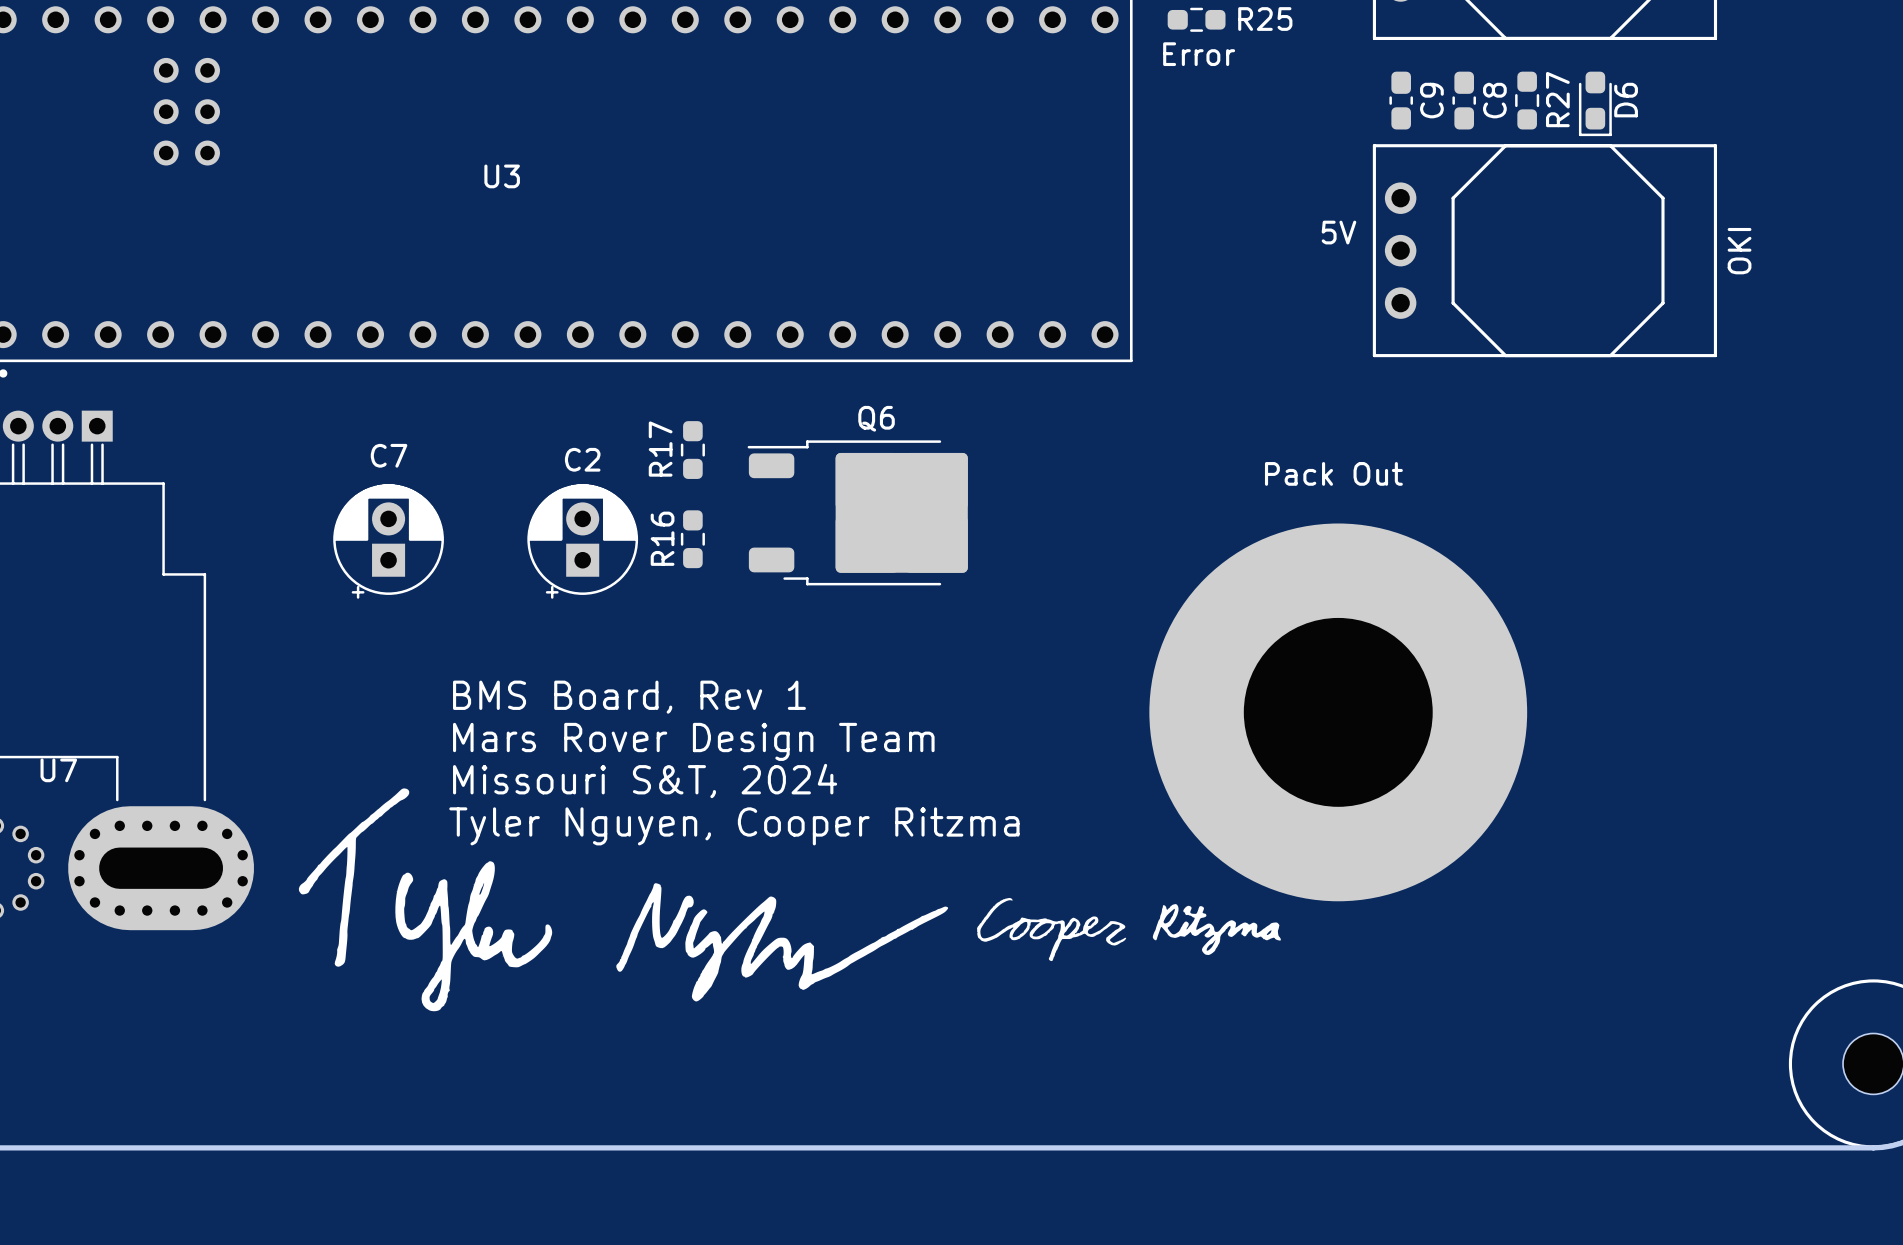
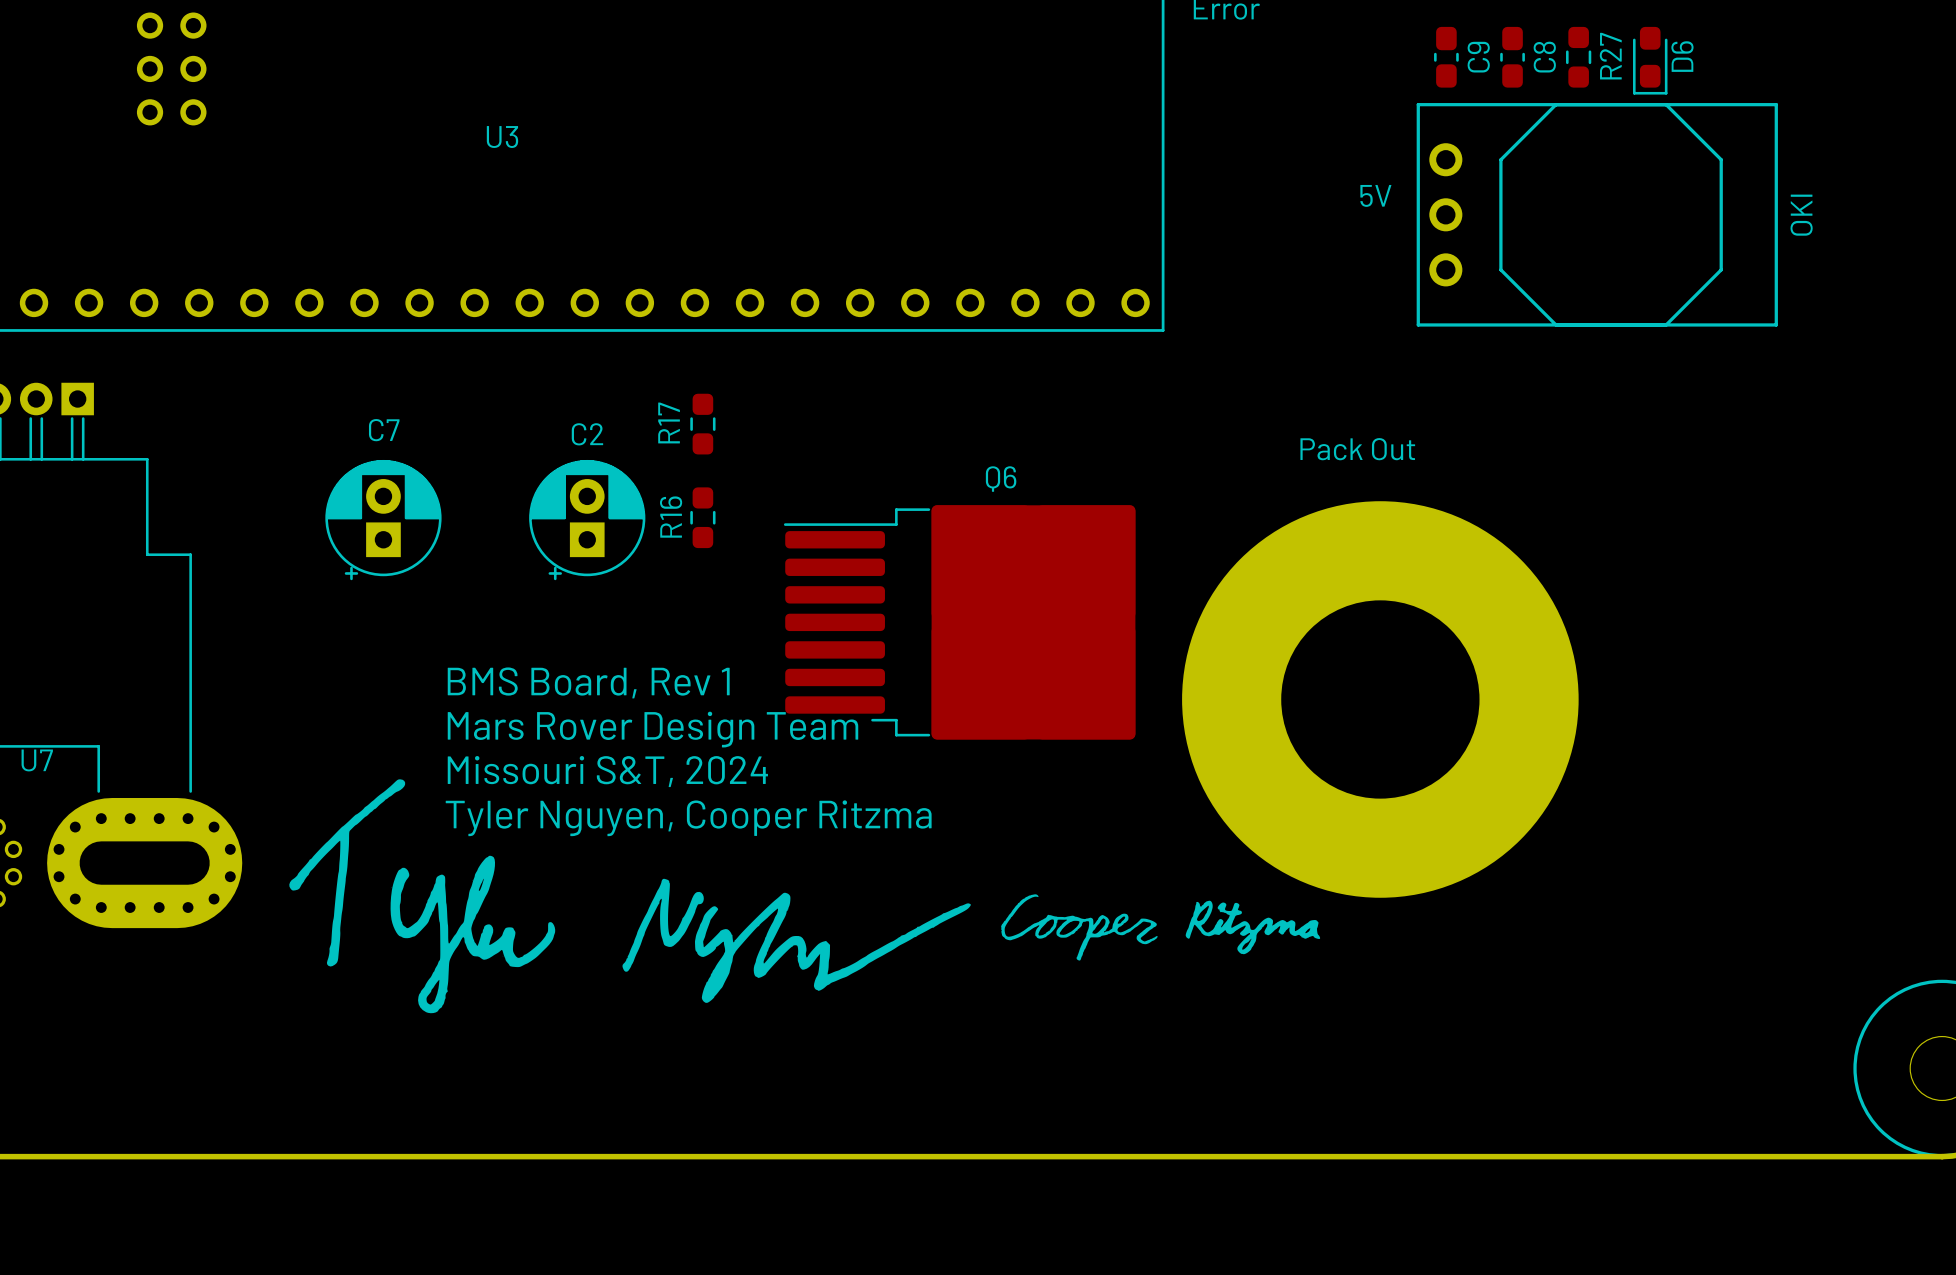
Q6 name position: Q6 (876, 418) -> Q6 (1001, 479)
Q6 footprint: [747, 440, 968, 586] -> [783, 505, 1136, 740]

